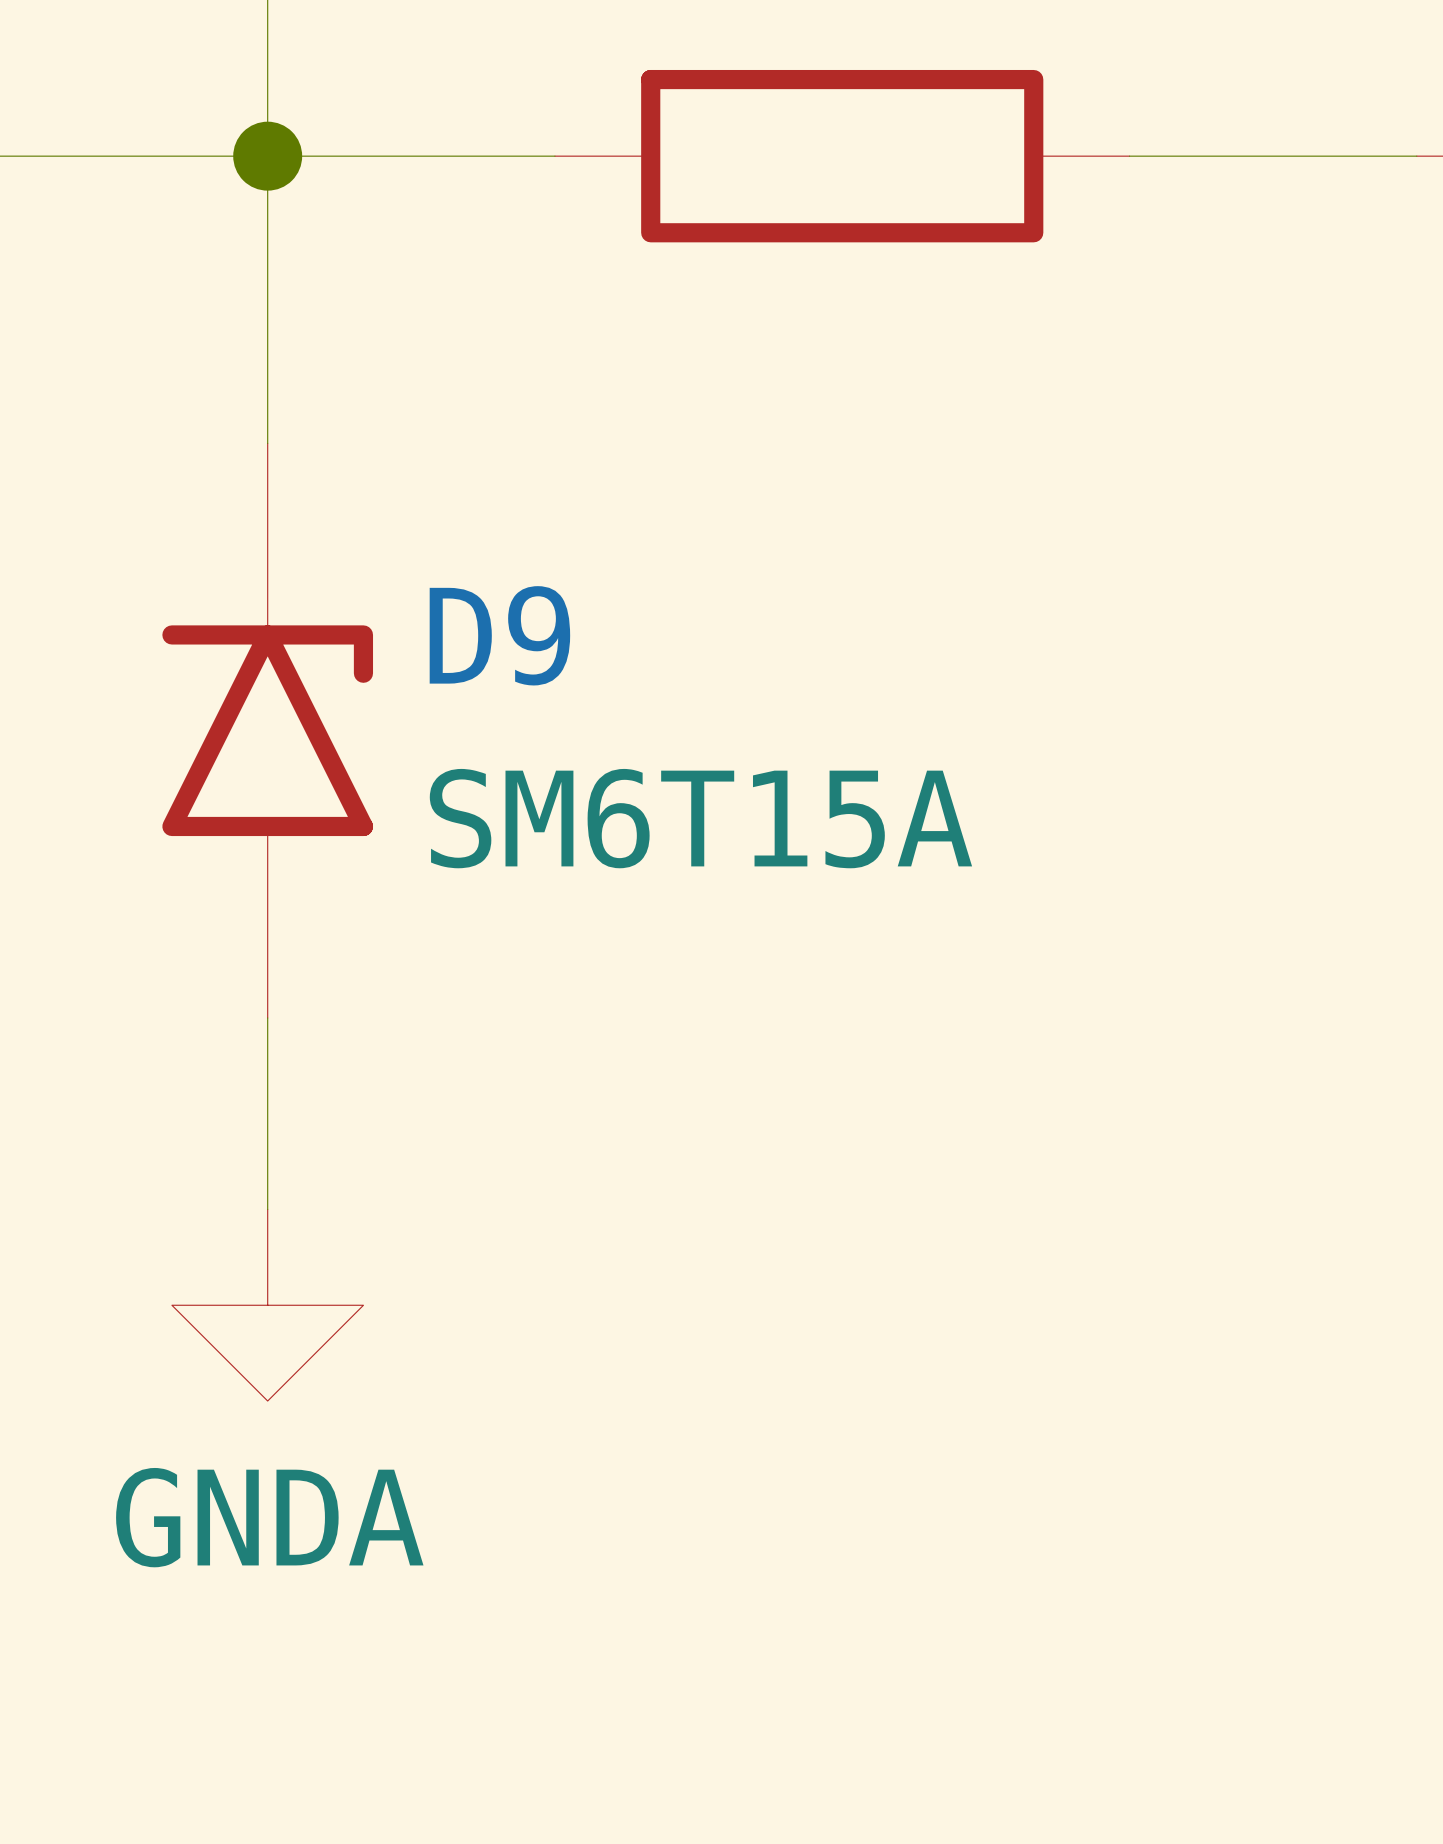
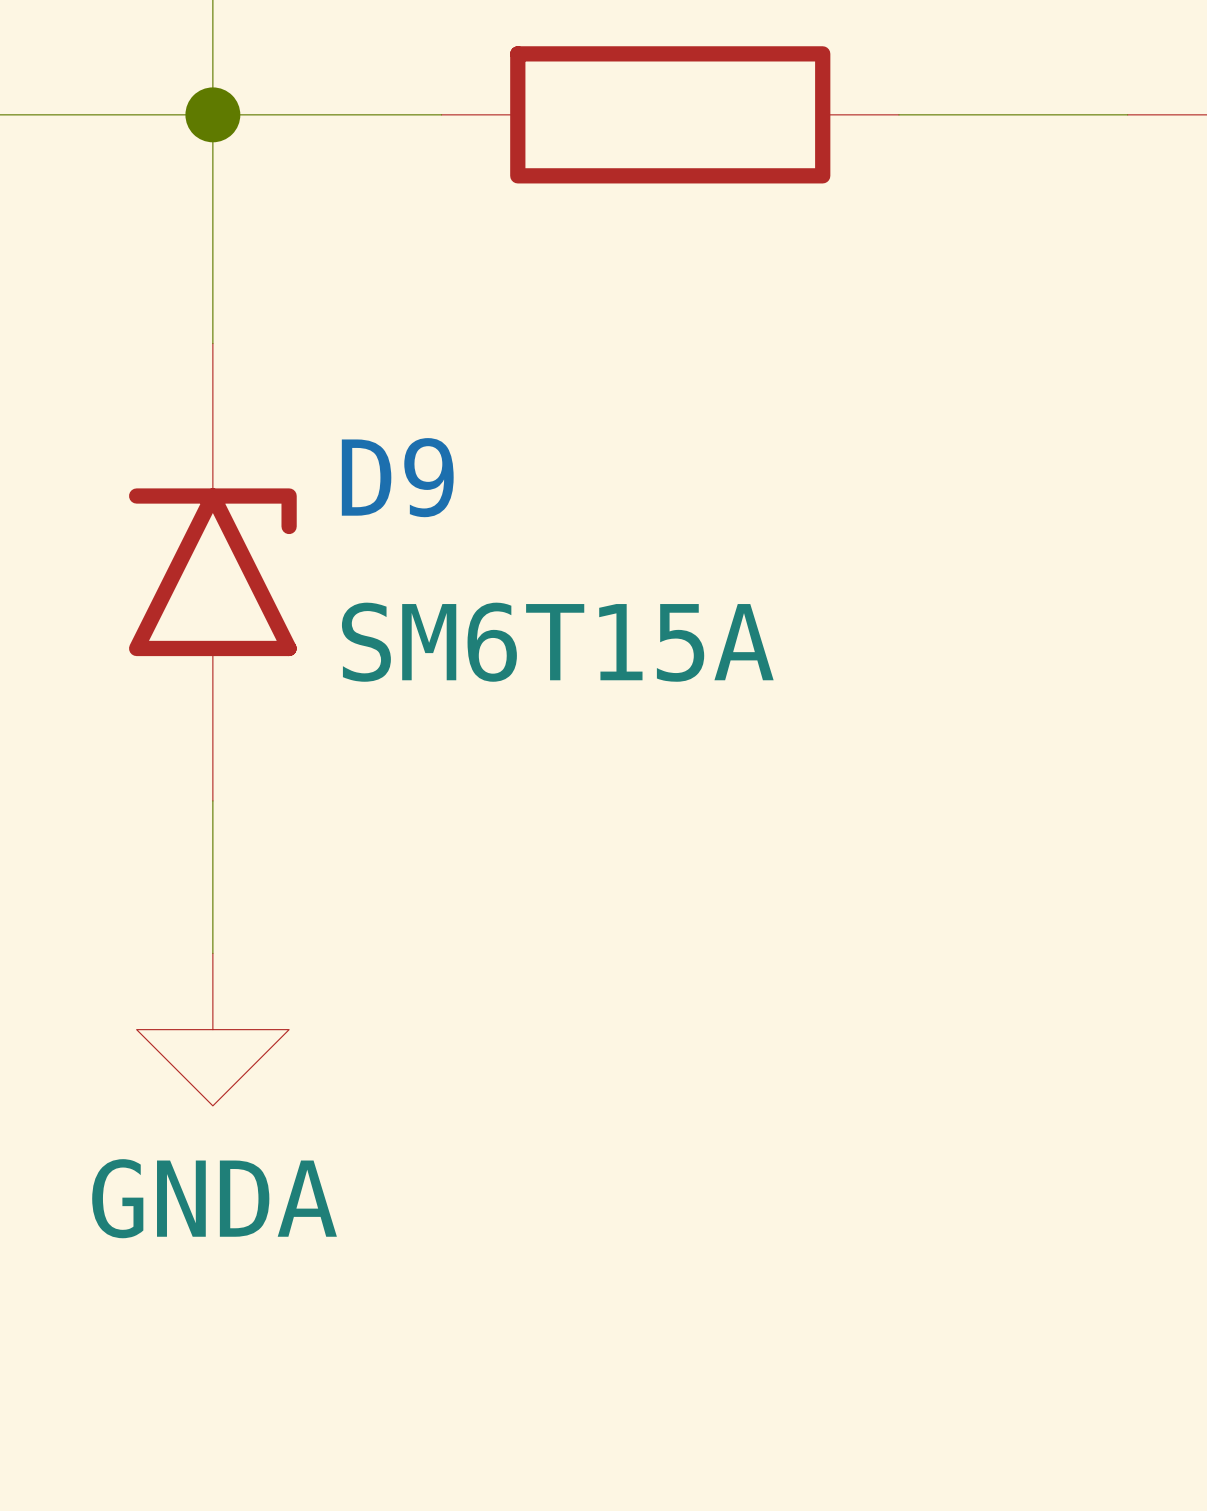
D9 name position: D9 (499, 635) -> D9 (397, 477)

